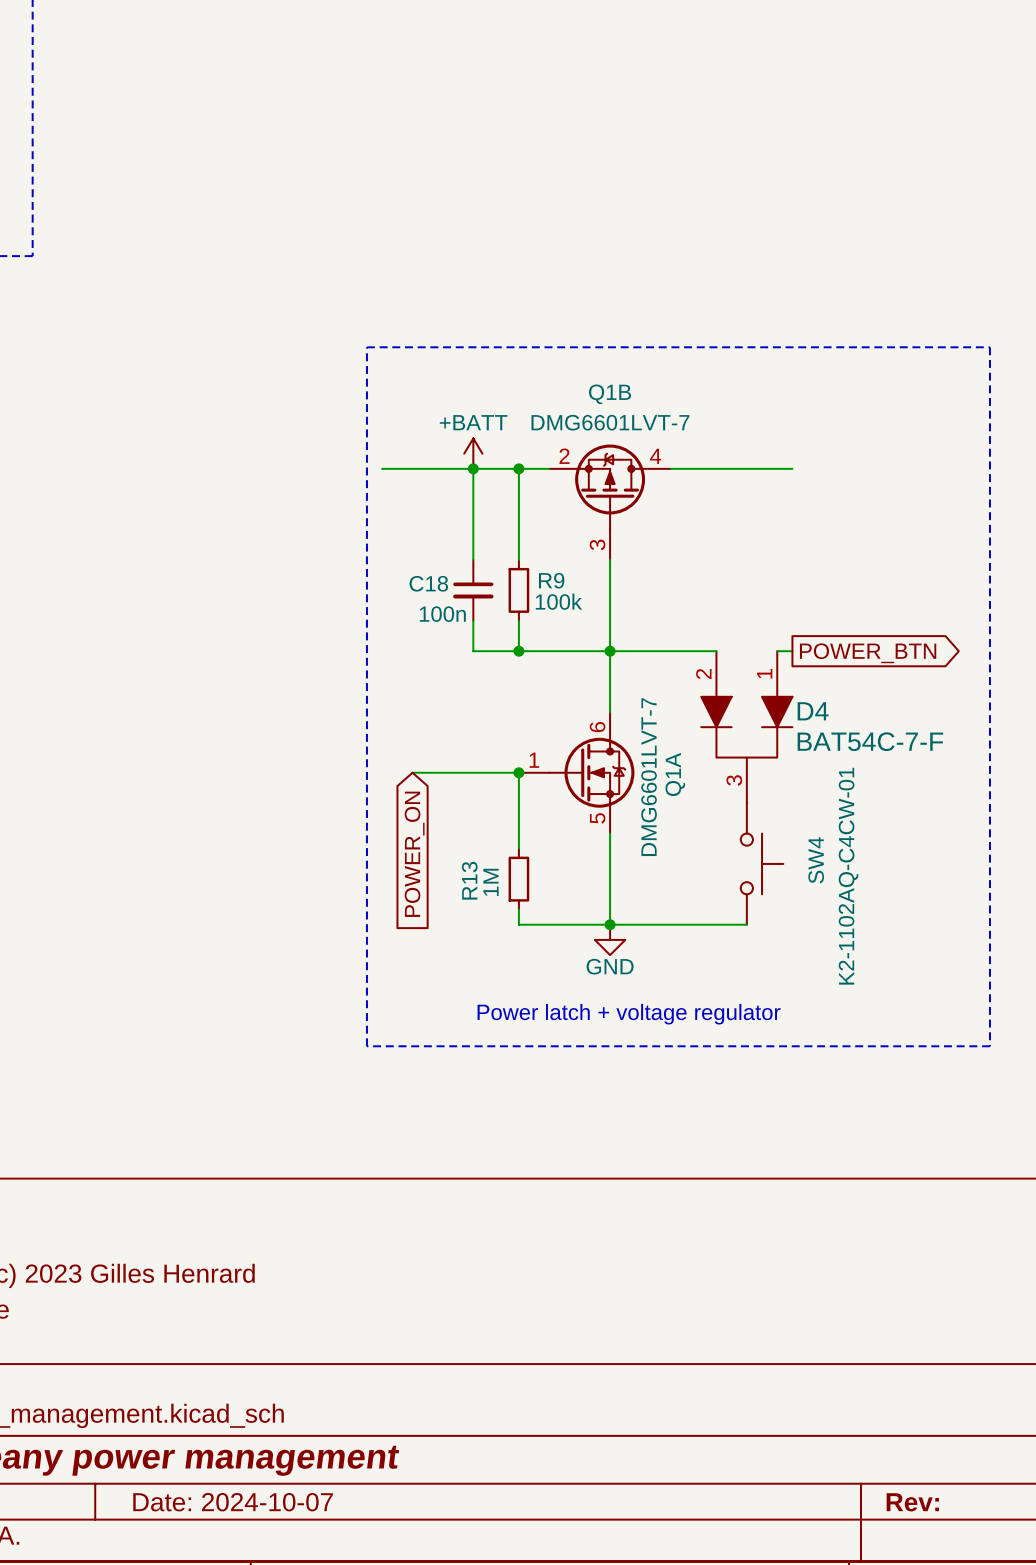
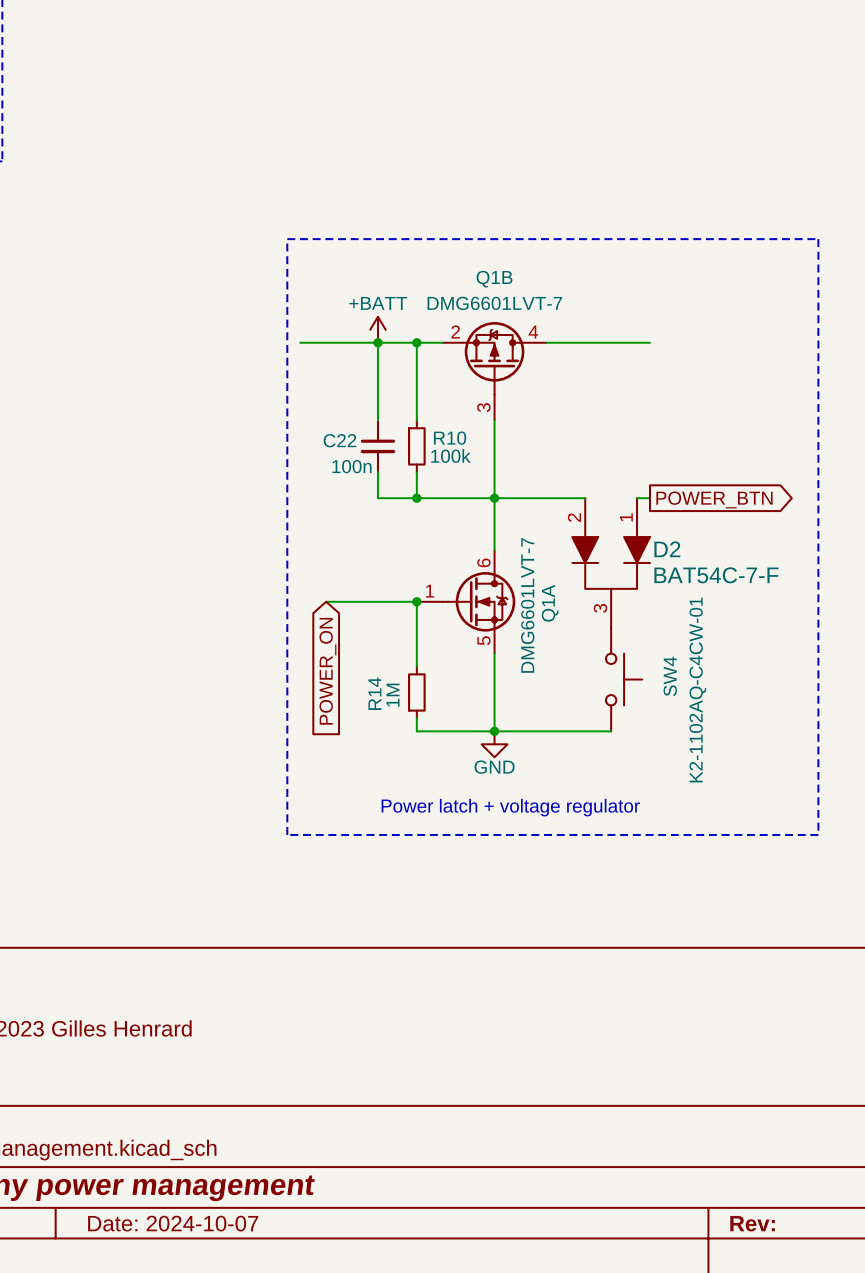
R9 name: R9 (551, 580) -> R10 (450, 438)
C18 name: C18 (428, 583) -> C22 (339, 440)
D4 name: D4 (813, 711) -> D2 (667, 549)
R13 name: R13 (469, 880) -> R14 (374, 693)

